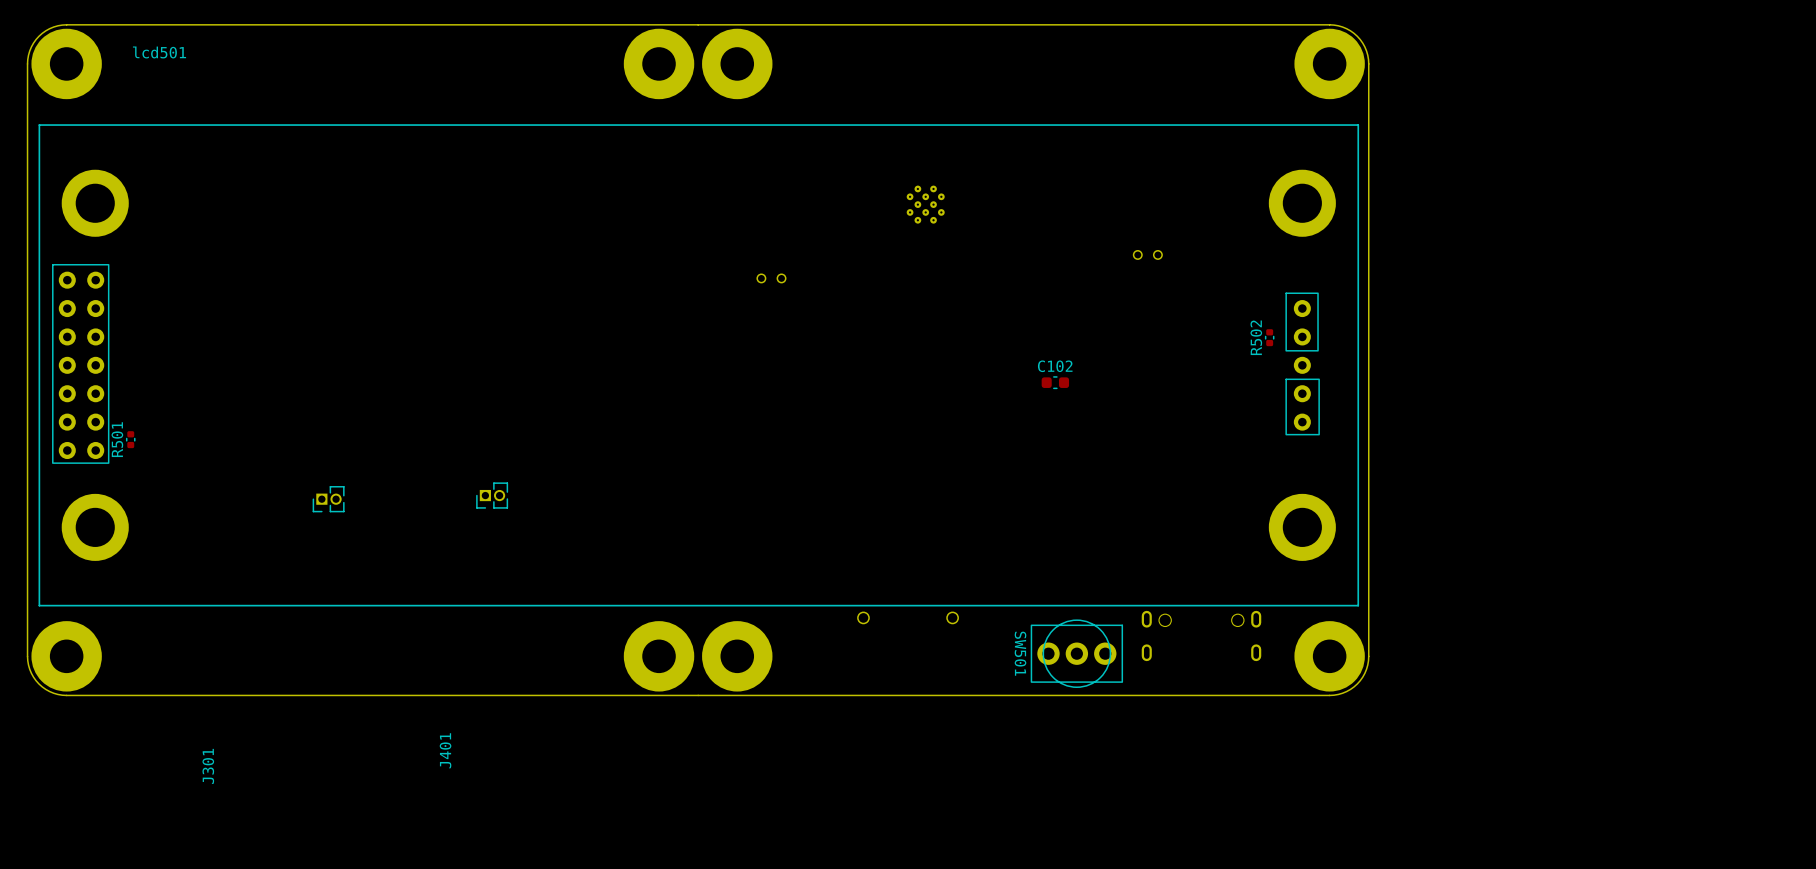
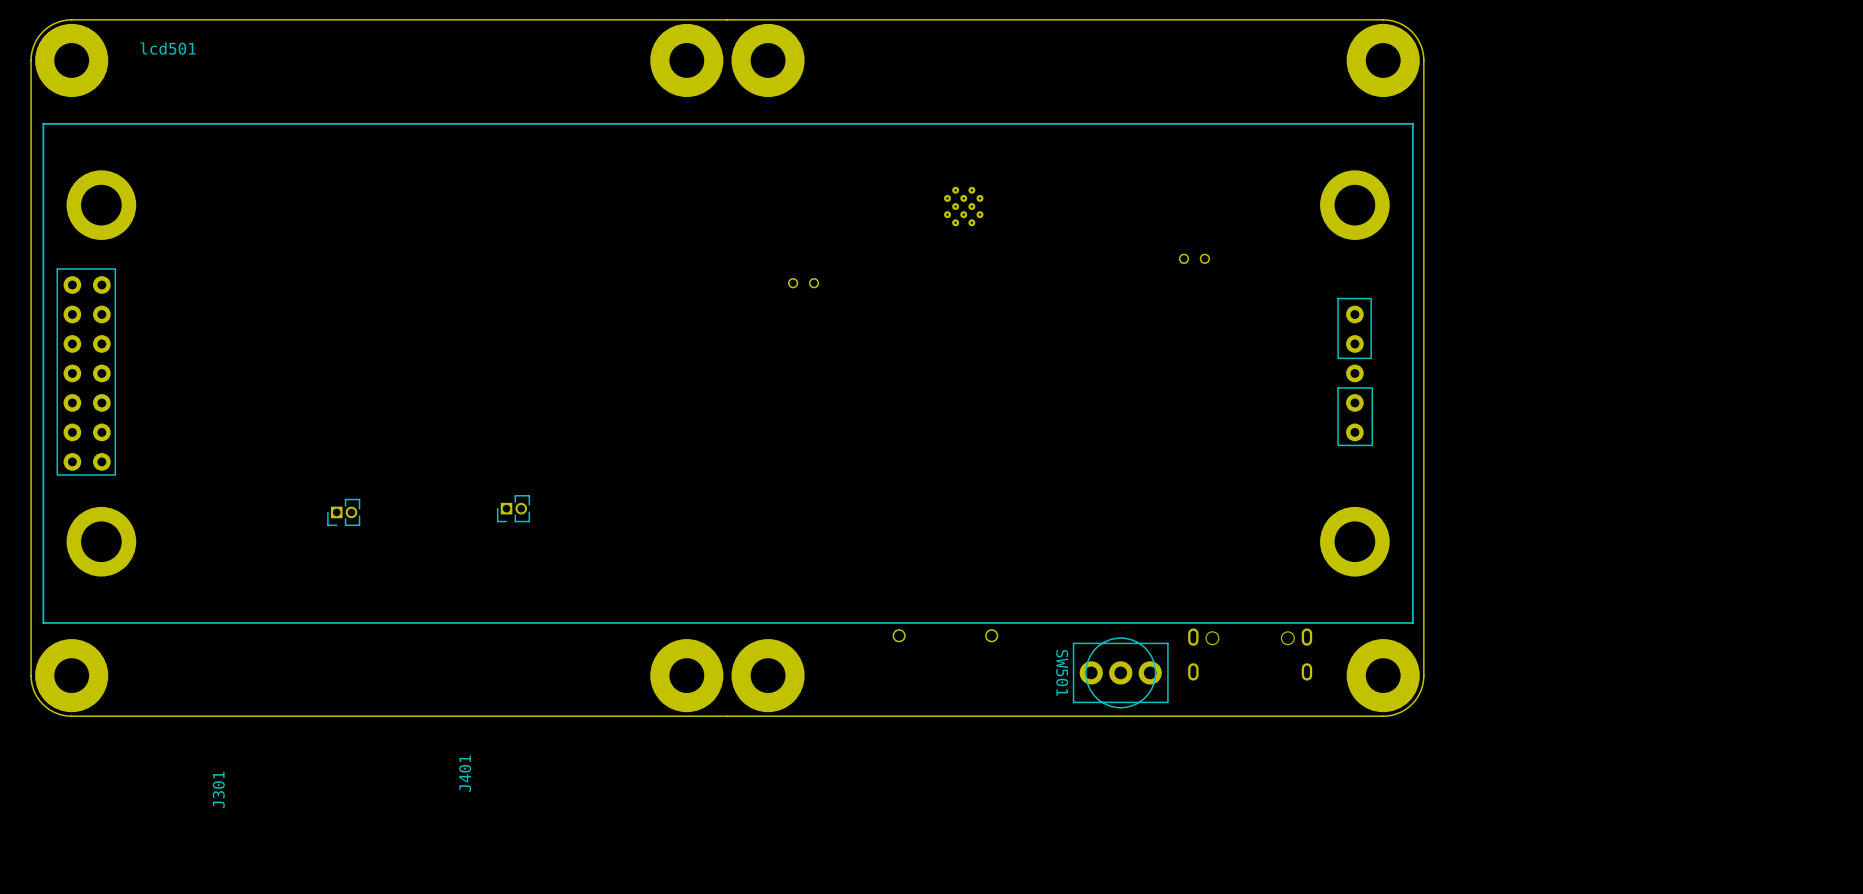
R502: (1269, 337) -> none
C102: (1055, 382) -> none
R501: (130, 439) -> none

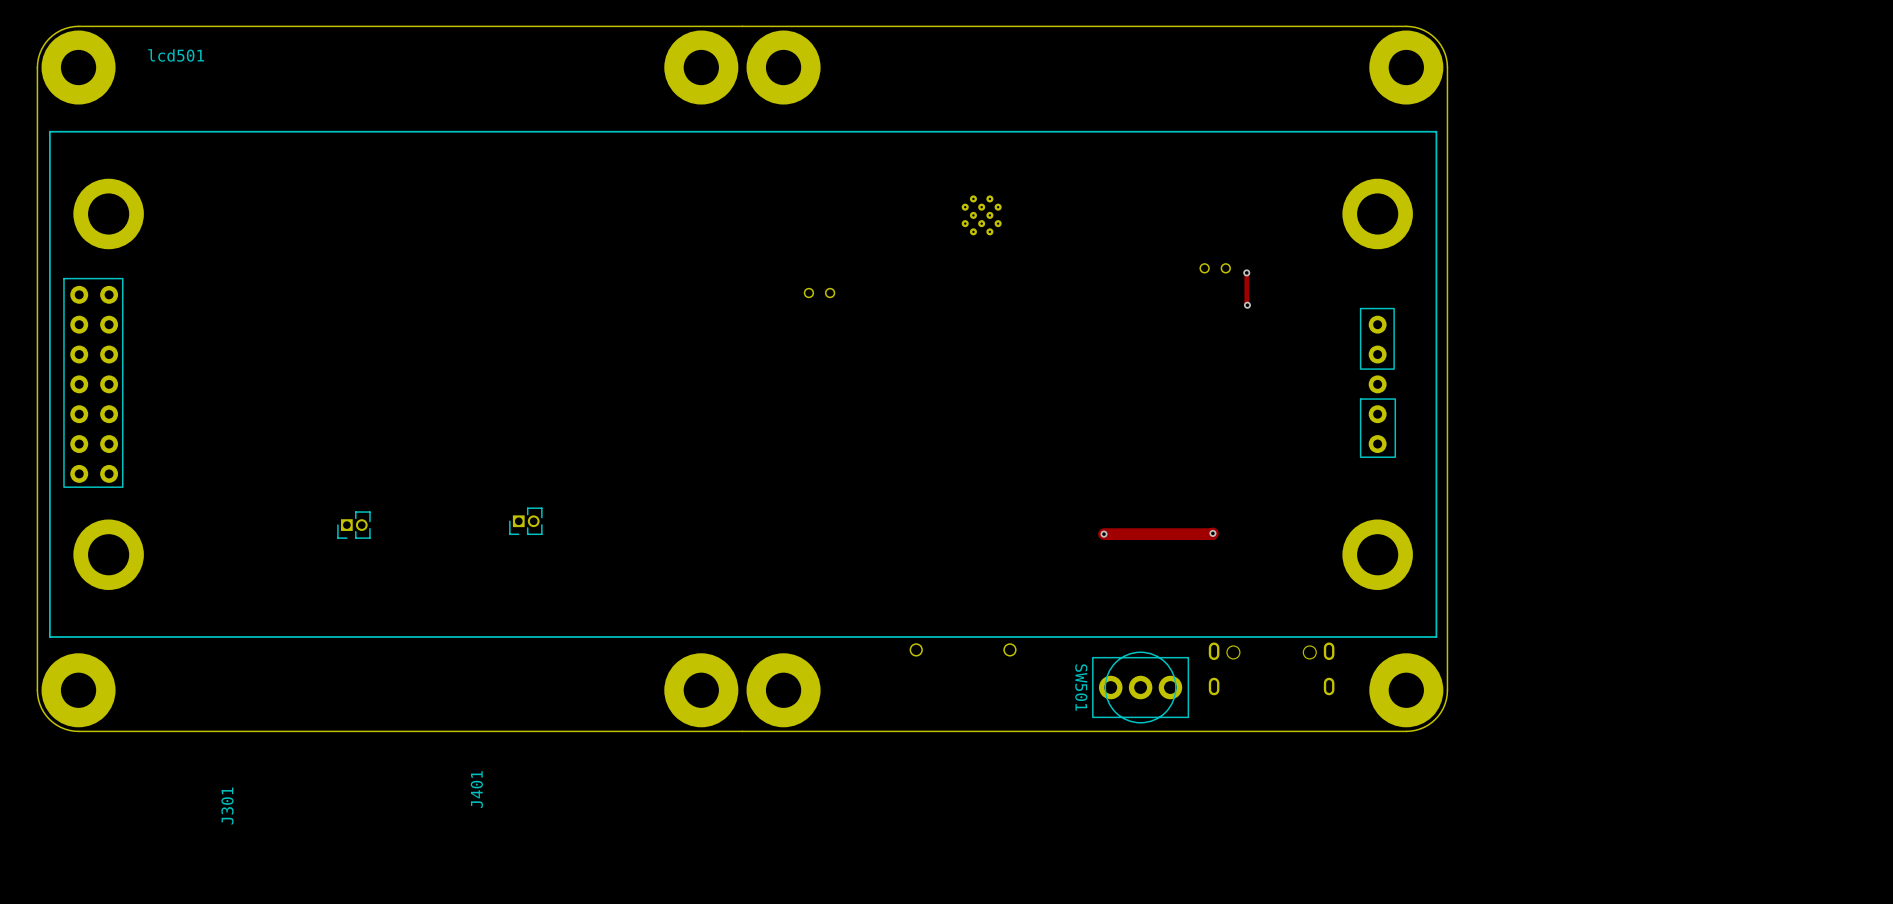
track: none -> (1246, 272) (1247, 305)
via: none -> (1246, 272)
via: none -> (1247, 305)
track: none -> (1212, 533) (1103, 534)
via: none -> (1212, 533)
via: none -> (1103, 534)

